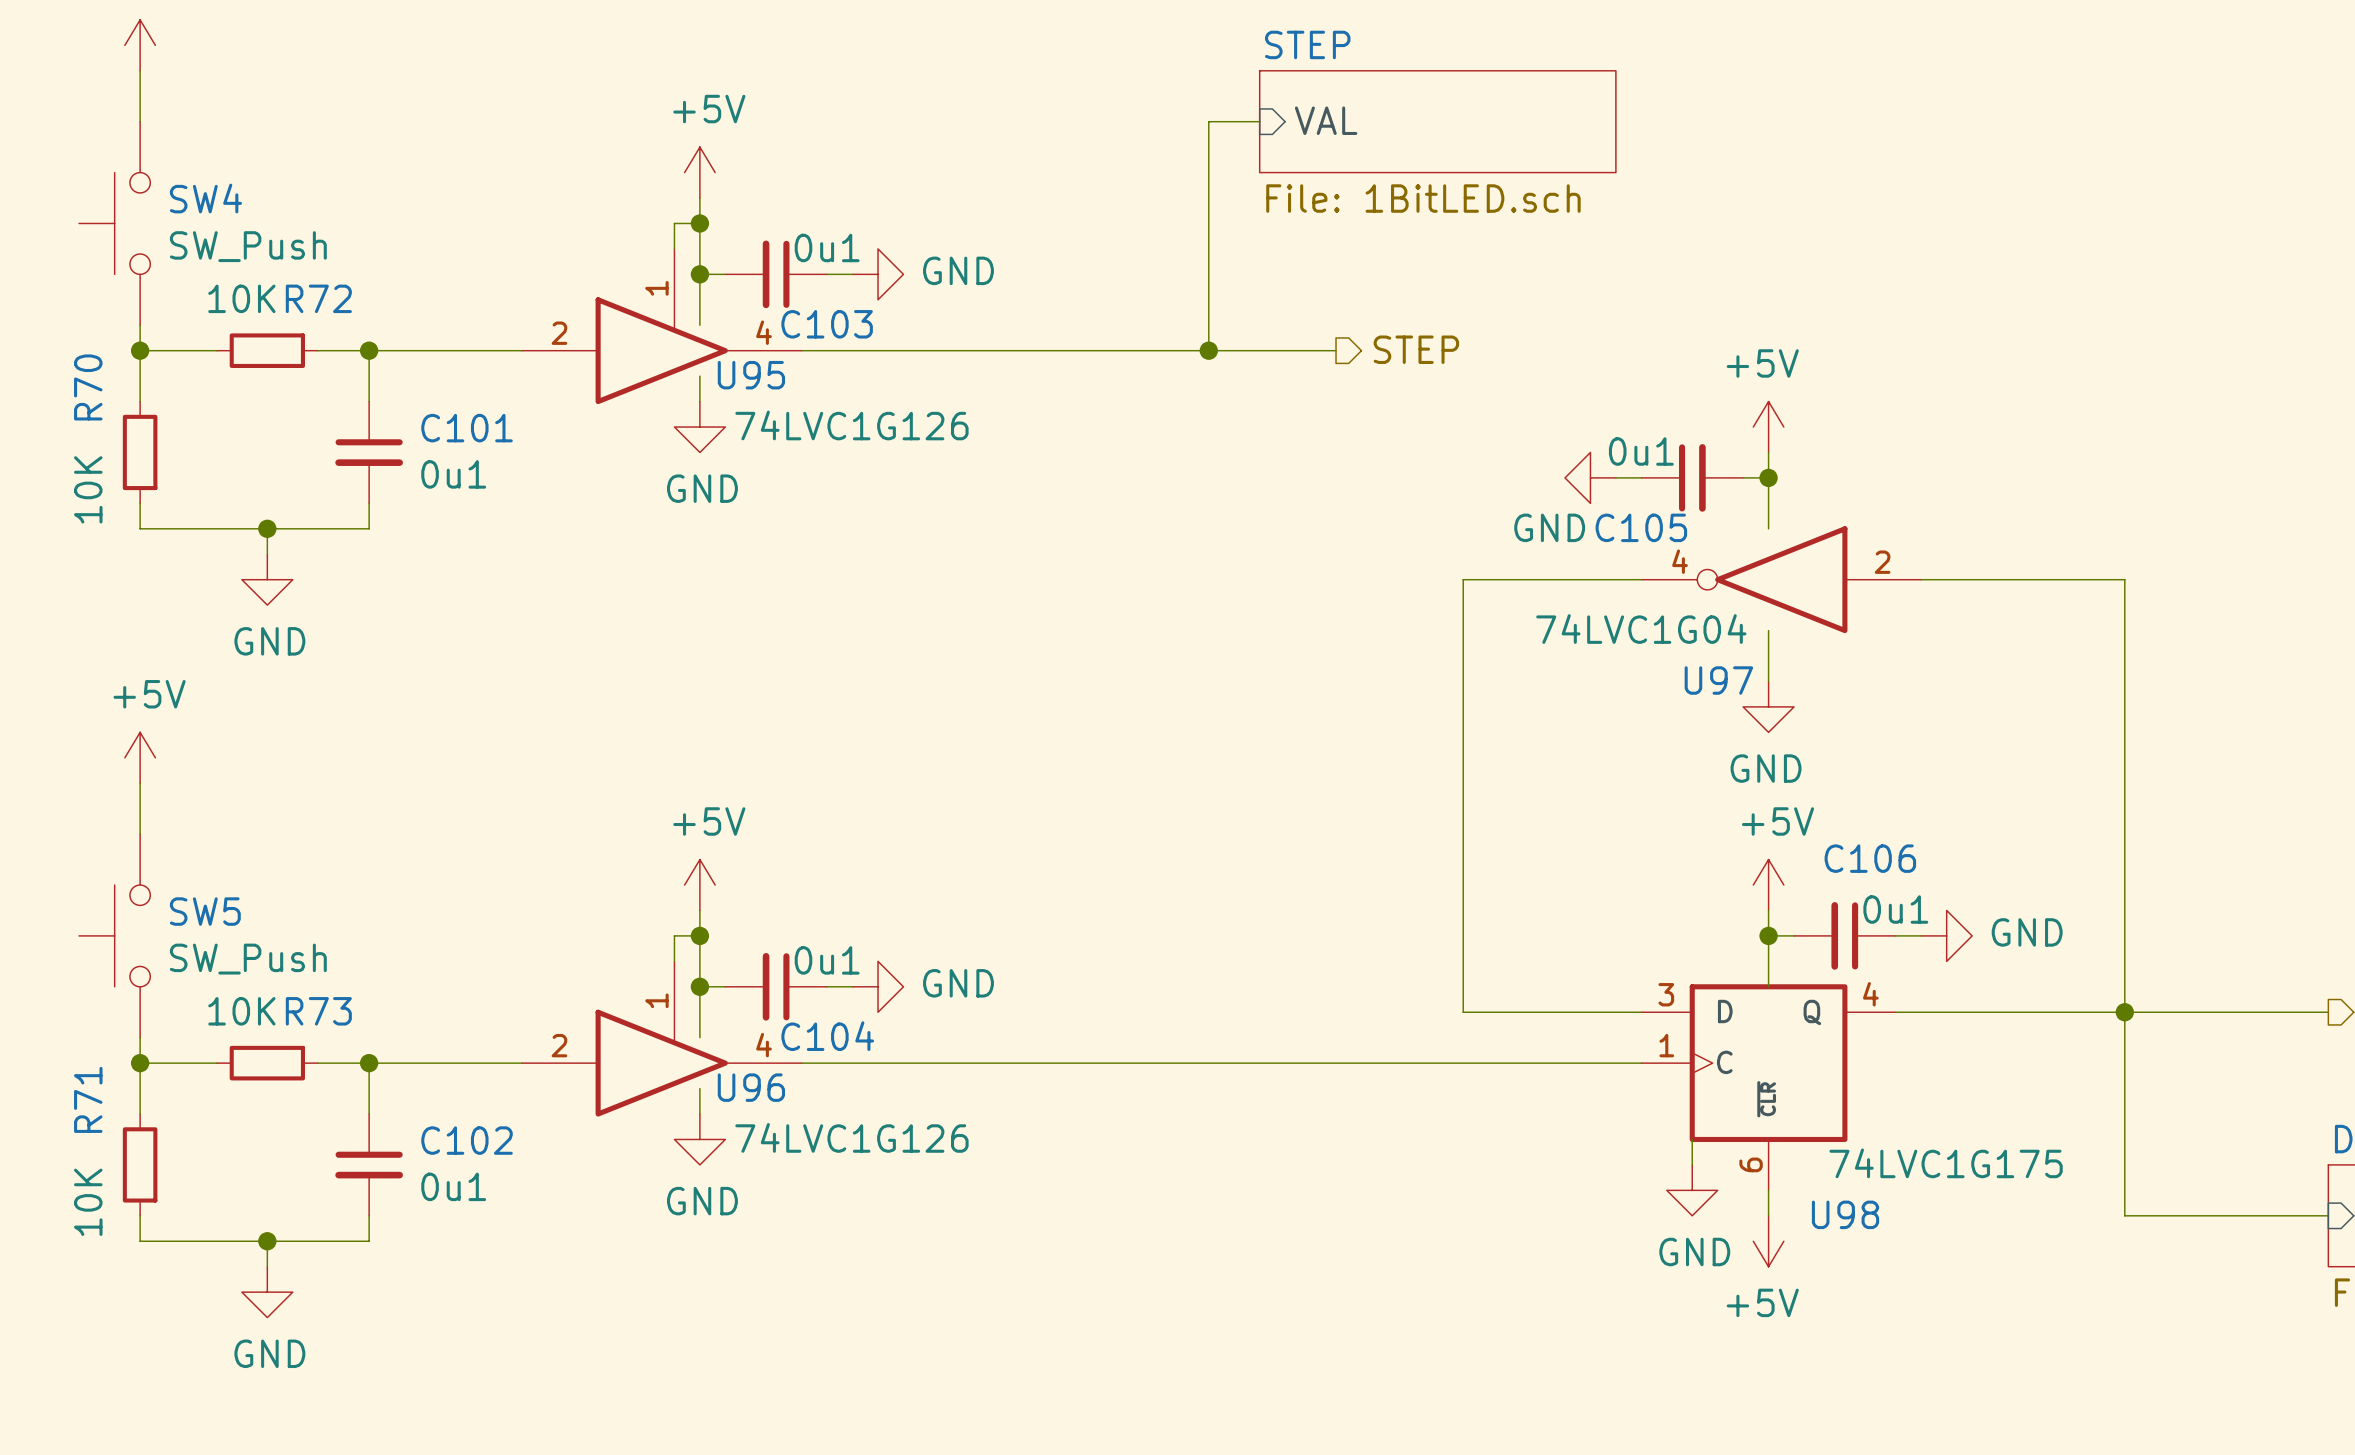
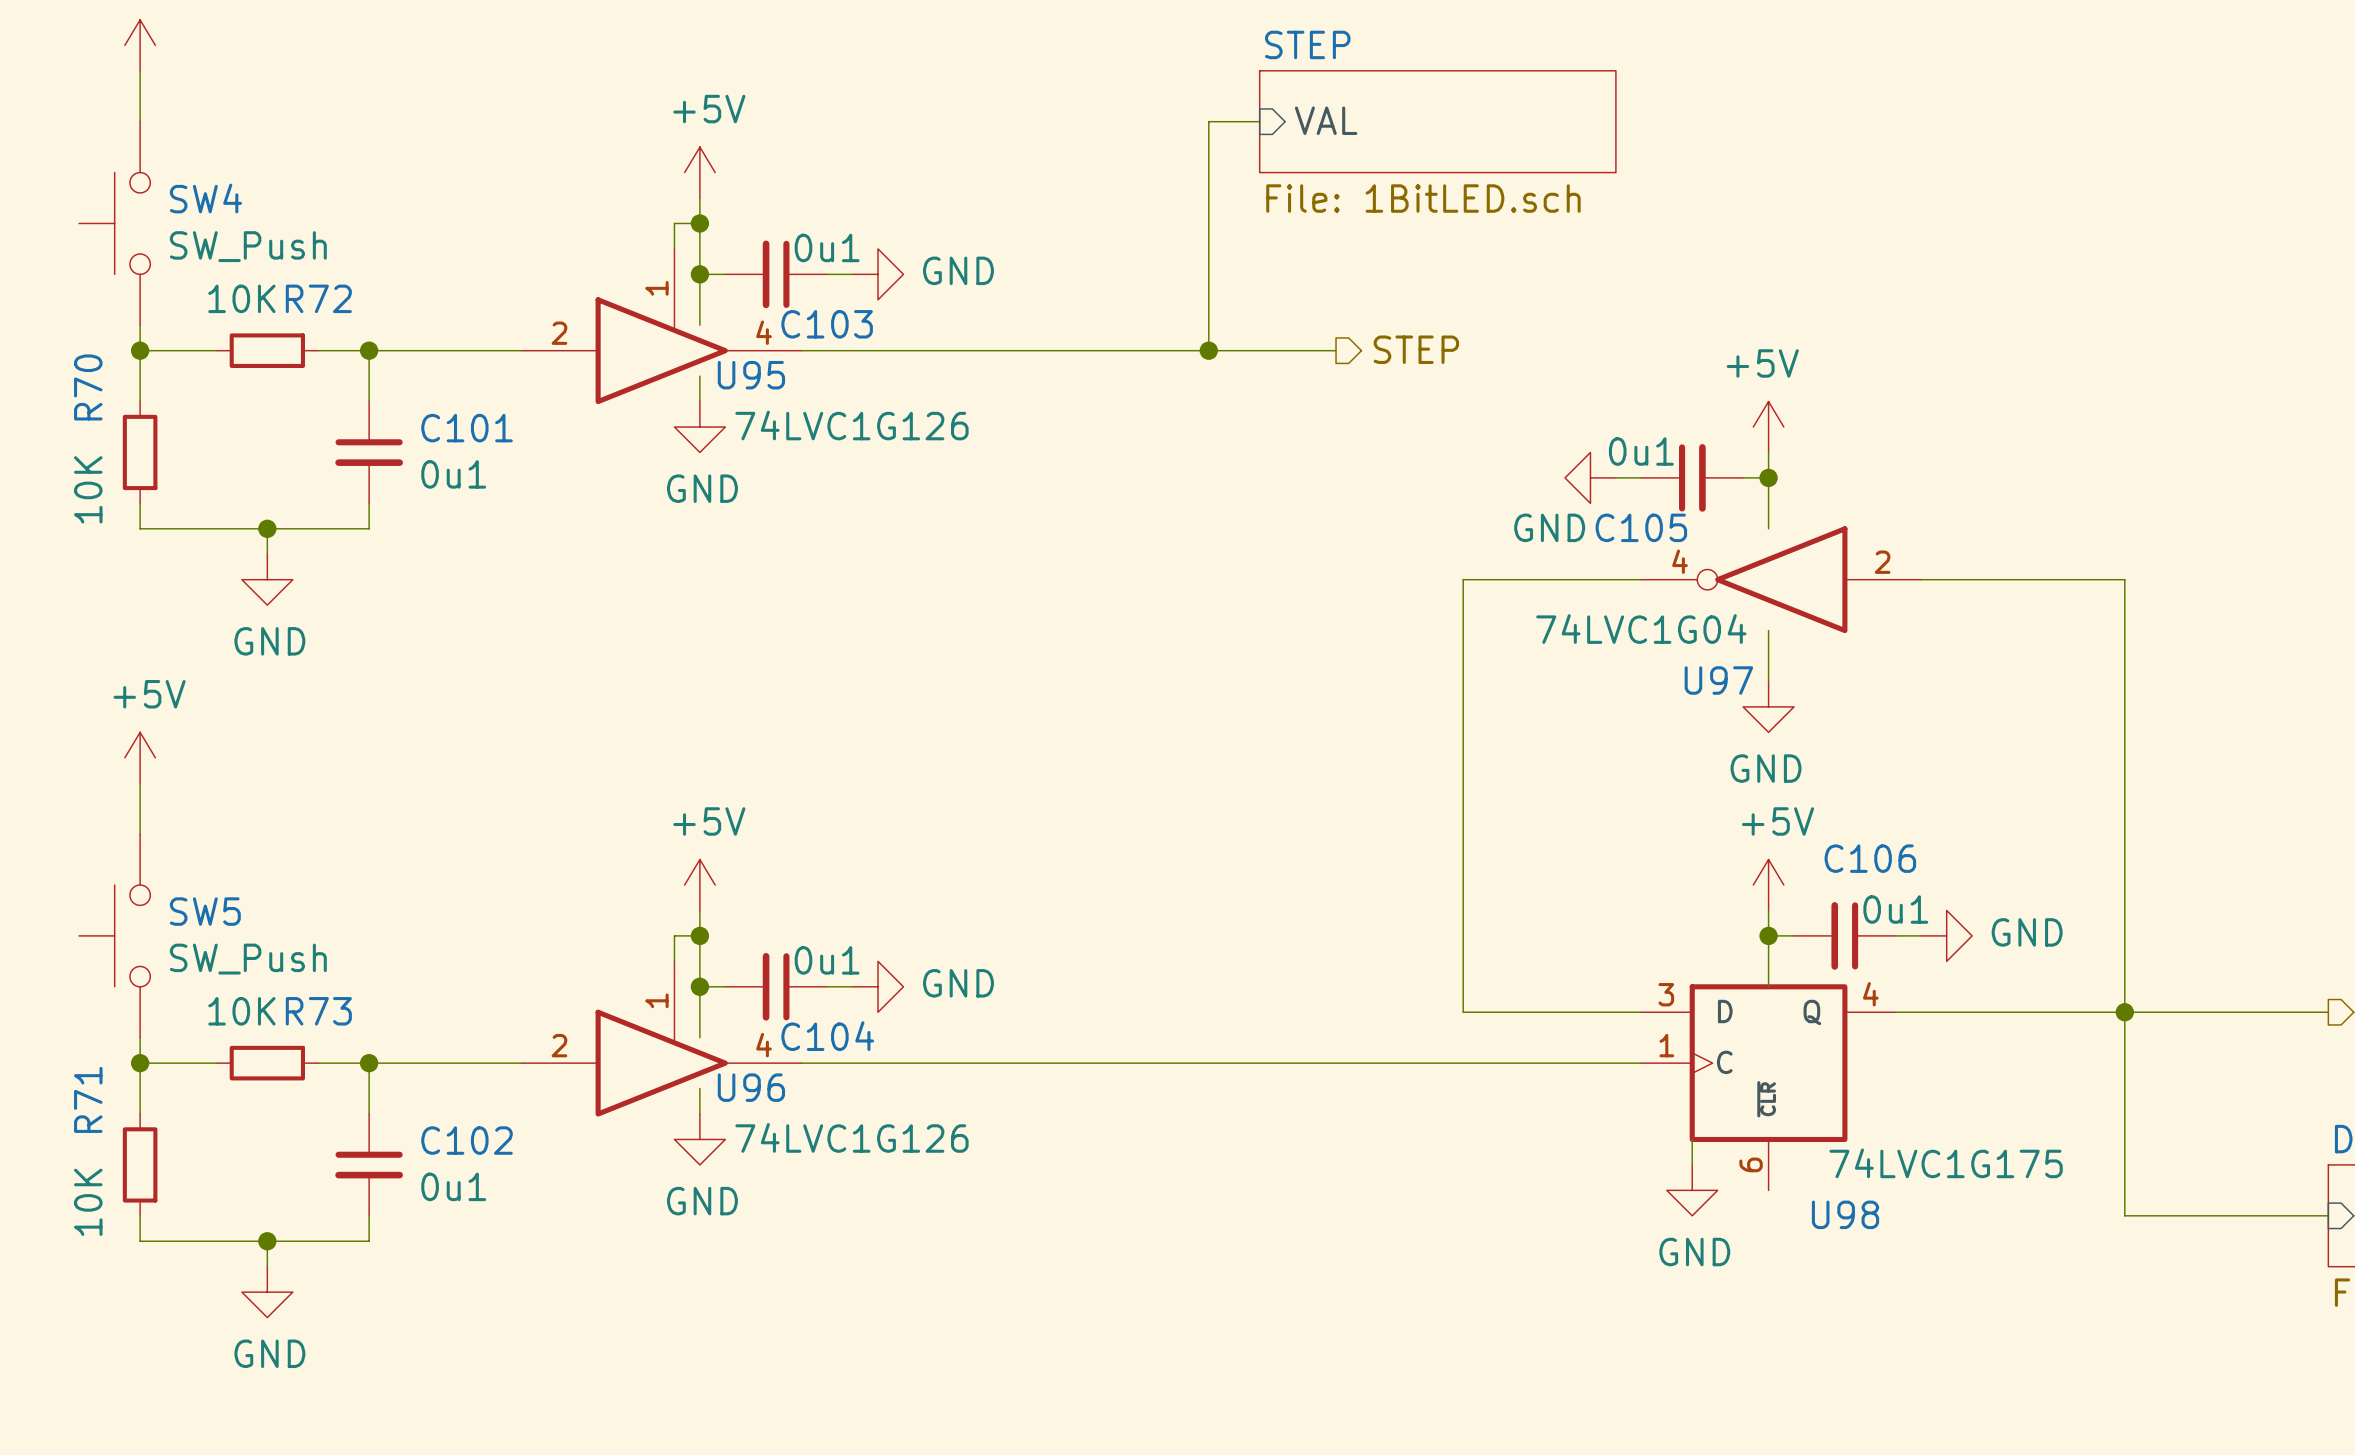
wire: (1768, 1190) (1768, 1215) -> none
power symbol: +5V (1768, 1241) -> none

